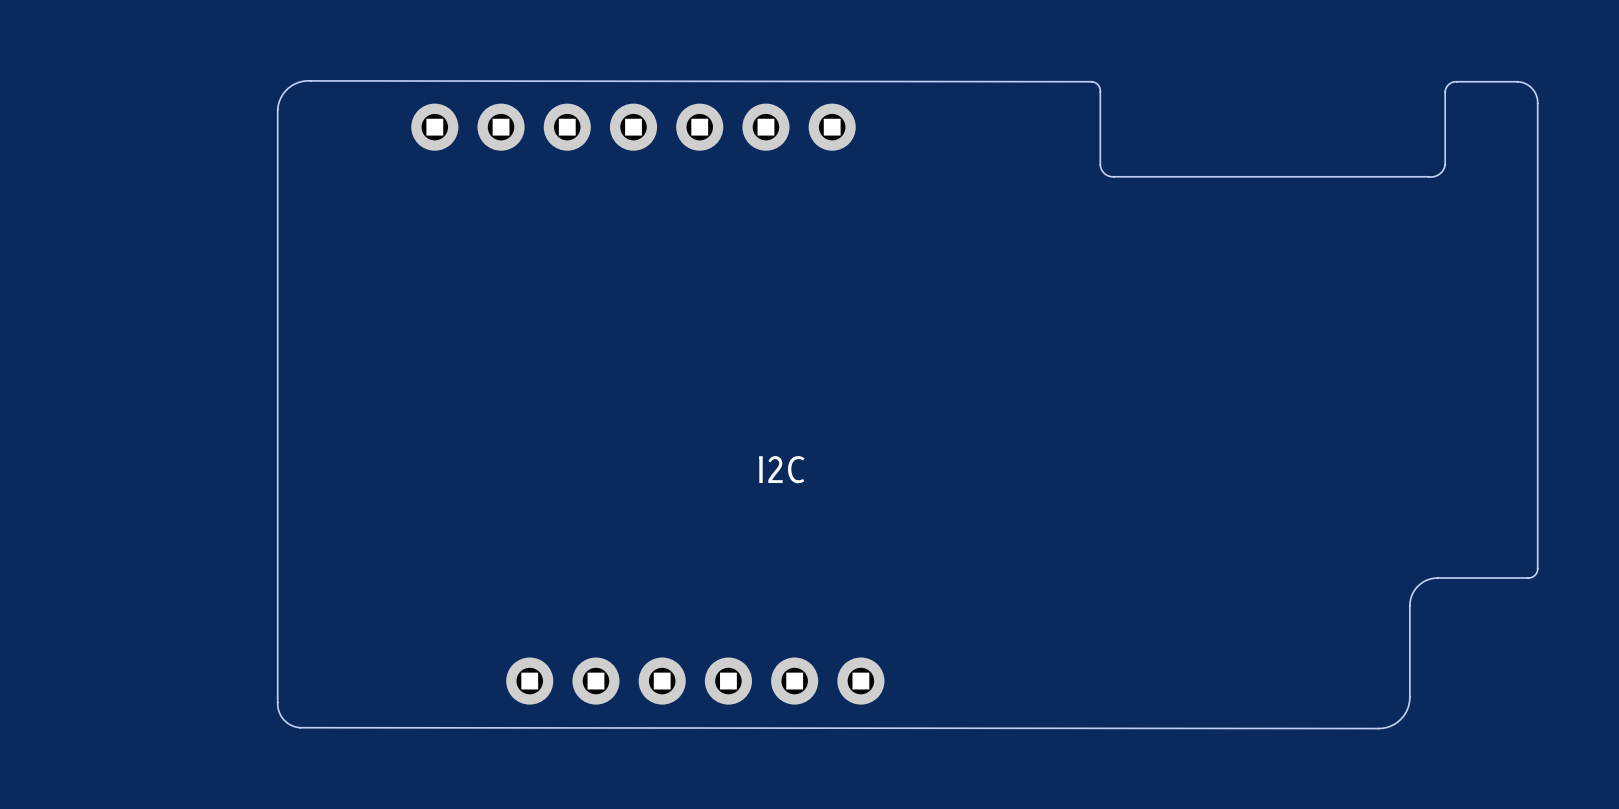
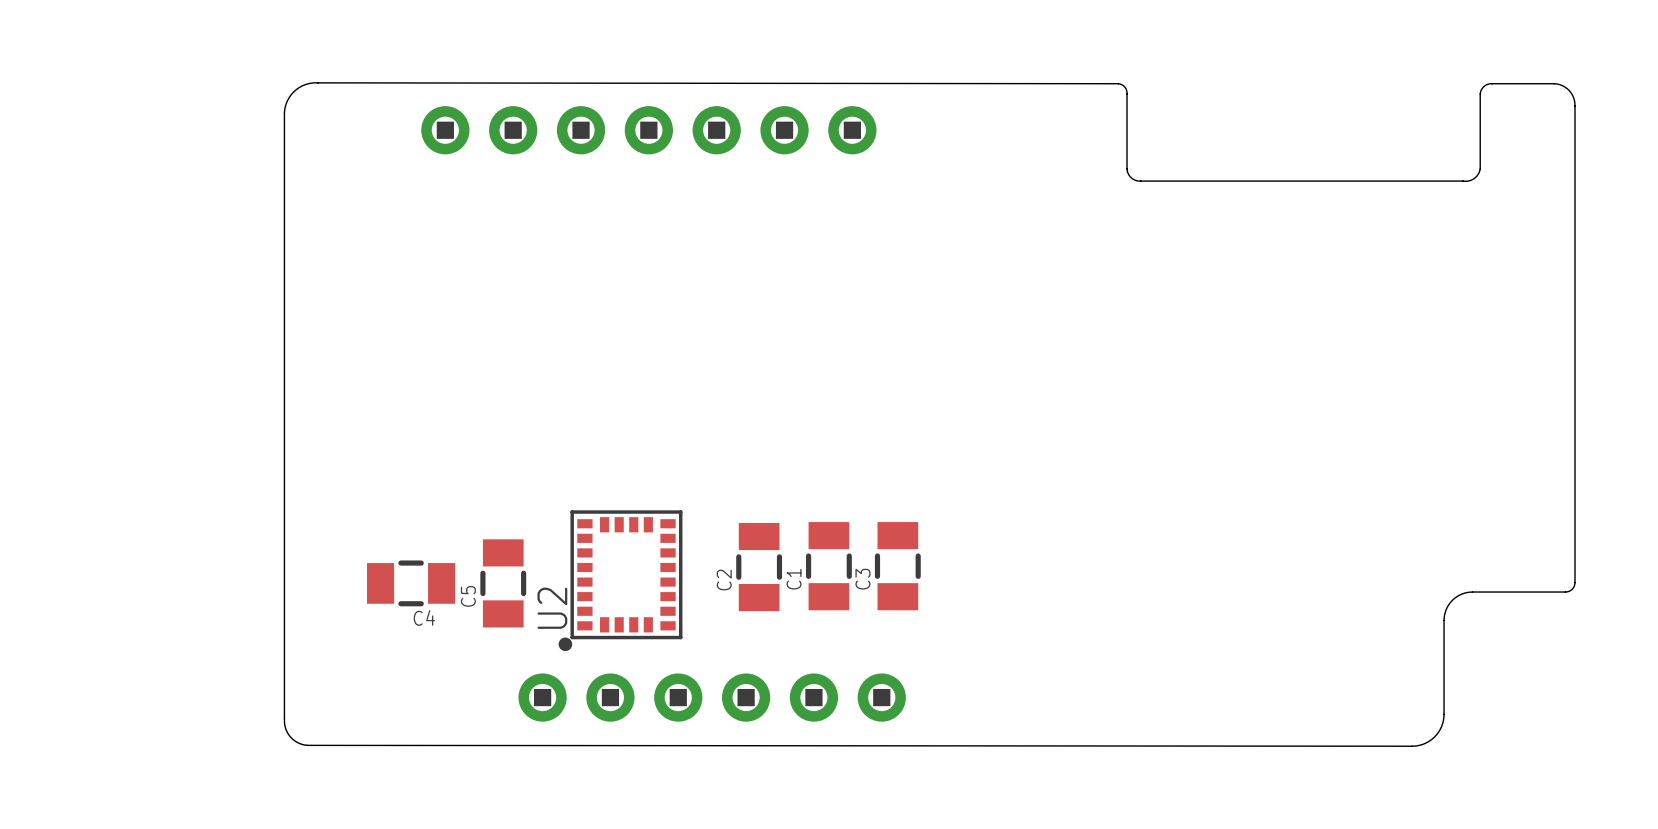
text: I2C (781, 469) -> none
C1: none -> (828, 566)
C3: none -> (897, 566)
C2: none -> (759, 567)
U2: none -> (620, 580)
C4: none -> (411, 583)
C5: none -> (503, 583)

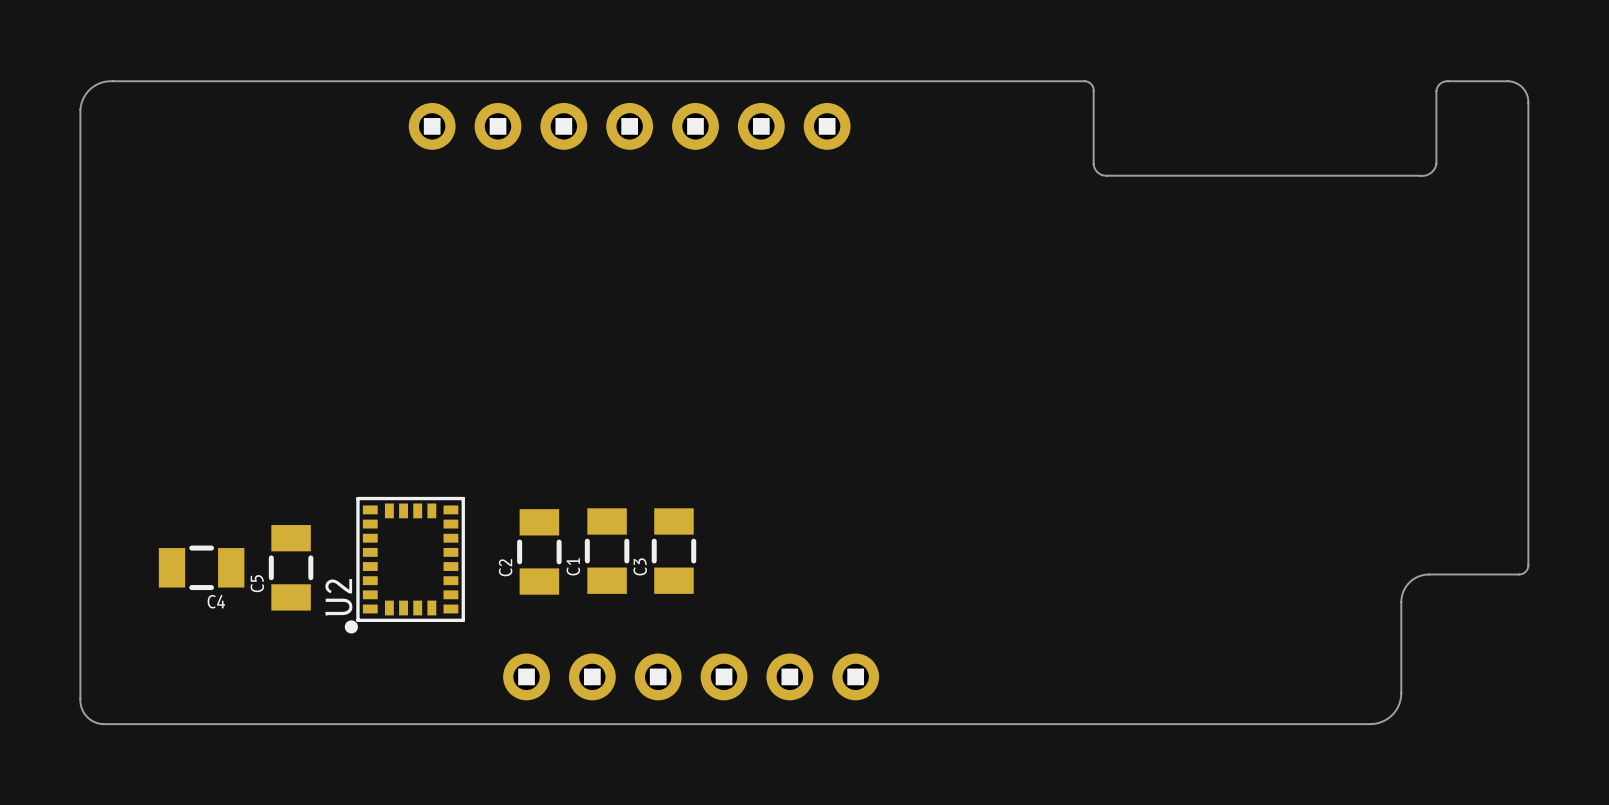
board edge: (1118, 83) (313, 82) (302, 86) (295, 90) (287, 100) (284, 112) (284, 719) (287, 731) (295, 741) (307, 745) (1412, 746) -> (1085, 81) (109, 81) (93, 86) (83, 98) (80, 109) (80, 699) (82, 711) (91, 720) (102, 724) (1370, 724)
C1 position: (828, 566) -> (607, 551)
C3 position: (897, 566) -> (673, 551)
C2 position: (759, 567) -> (539, 551)
U2 position: (620, 580) -> (404, 565)
C4 position: (411, 583) -> (201, 567)
C5 position: (503, 583) -> (291, 567)

